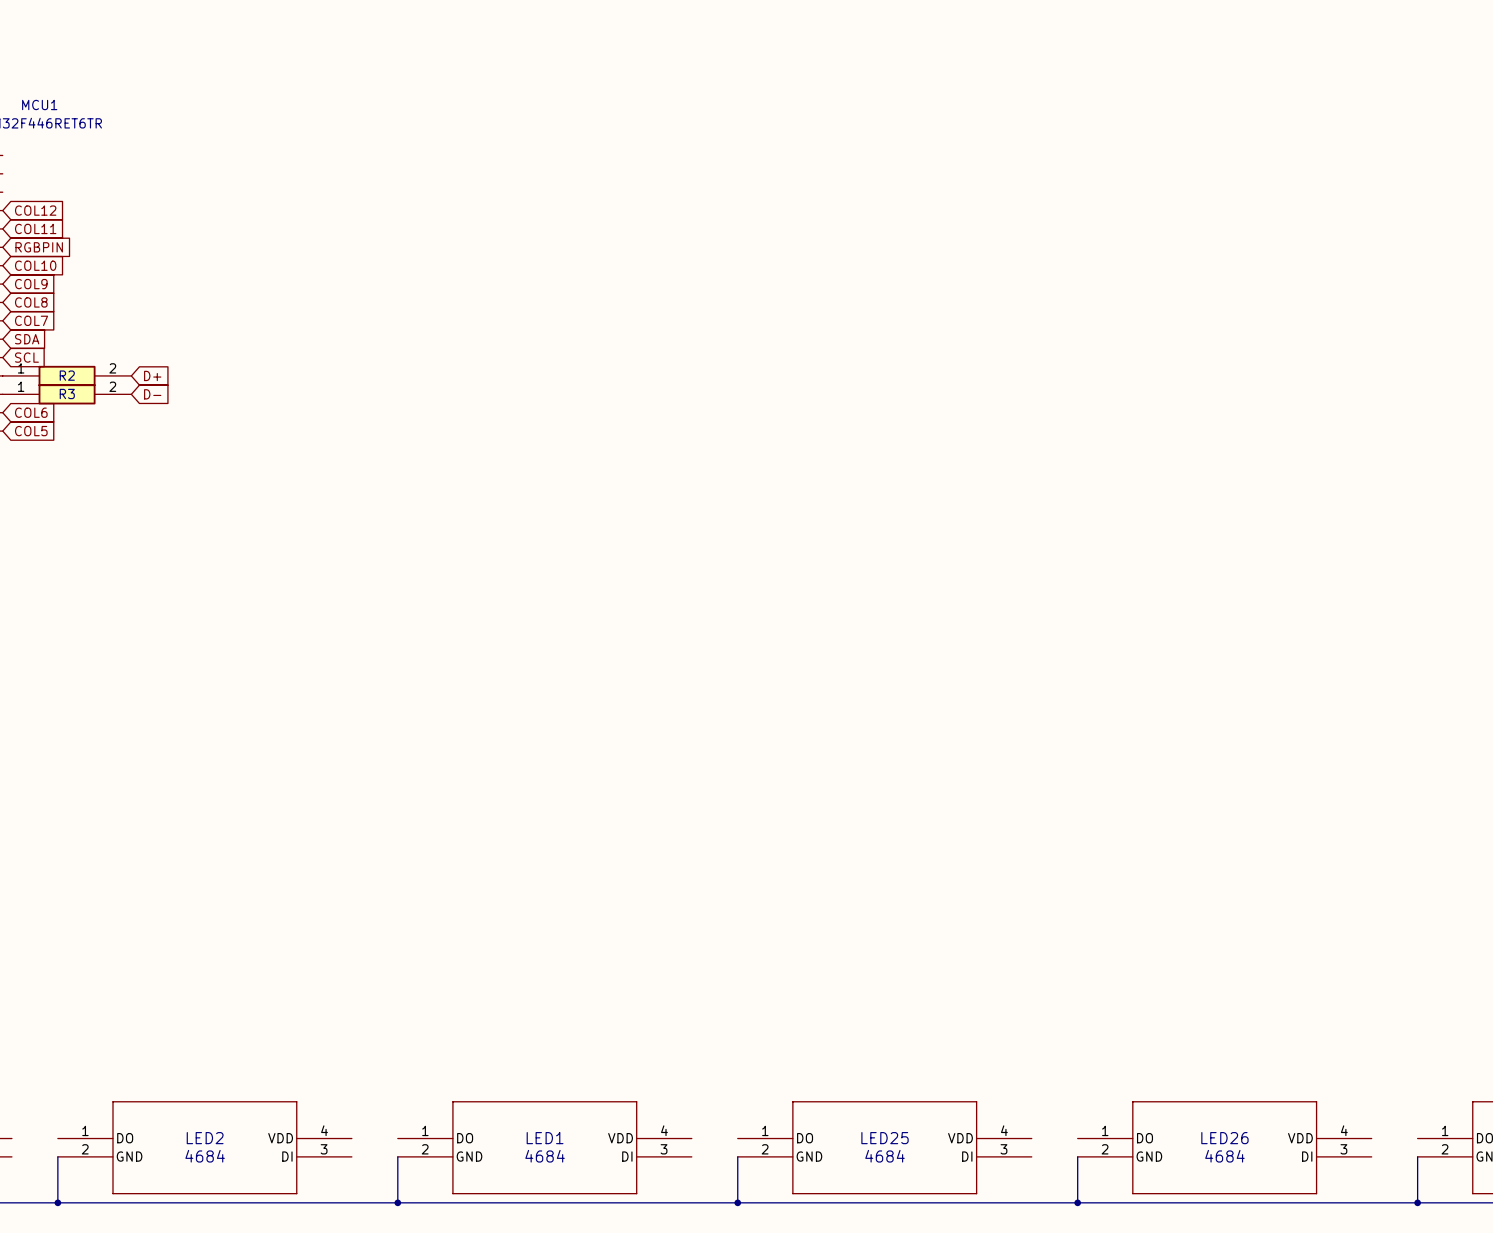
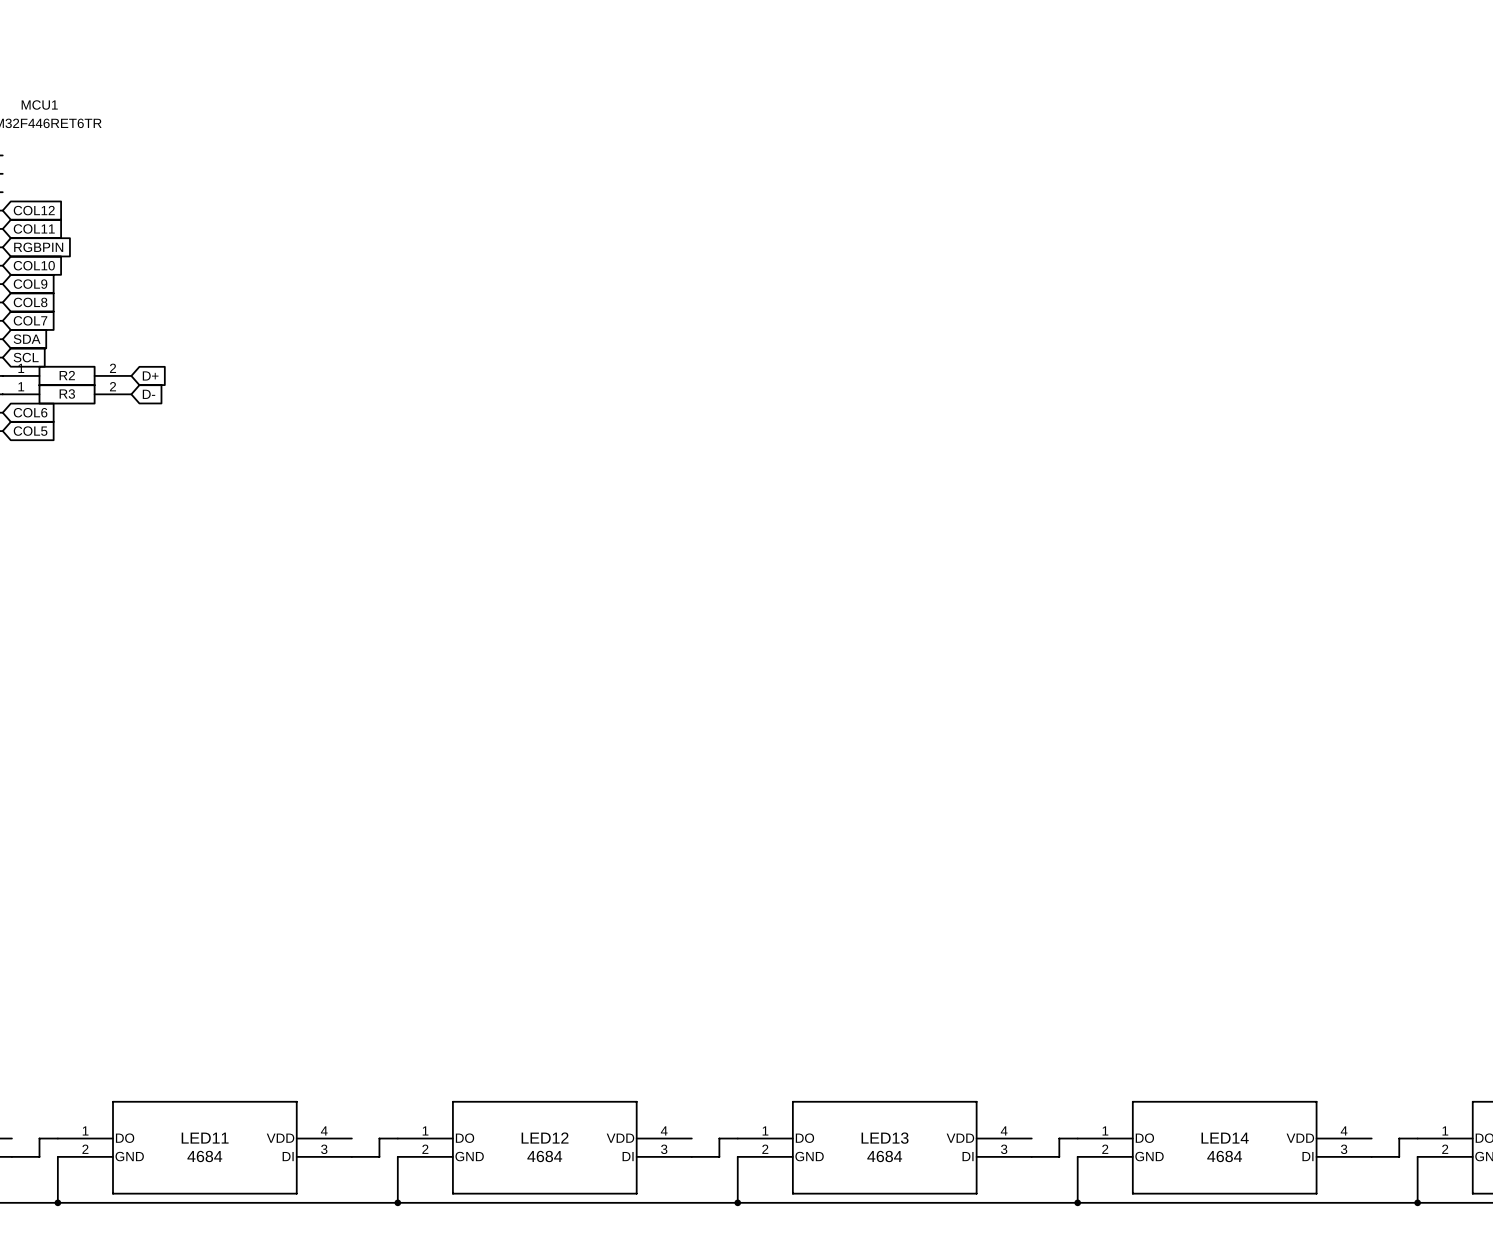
wire: none -> (57, 1138) (39, 1138) (39, 1156) (11, 1156)
LED2 name: LED2 (205, 1138) -> LED11 (205, 1138)
wire: none -> (397, 1138) (379, 1138) (379, 1156) (351, 1156)
LED1 name: LED1 (545, 1138) -> LED12 (545, 1138)
wire: none -> (737, 1138) (719, 1138) (719, 1156) (691, 1156)
LED25 name: LED25 (885, 1138) -> LED13 (885, 1138)
wire: none -> (1077, 1138) (1059, 1138) (1059, 1156) (1031, 1156)
LED26 name: LED26 (1224, 1138) -> LED14 (1225, 1138)
wire: none -> (1417, 1138) (1399, 1138) (1399, 1156) (1371, 1156)

